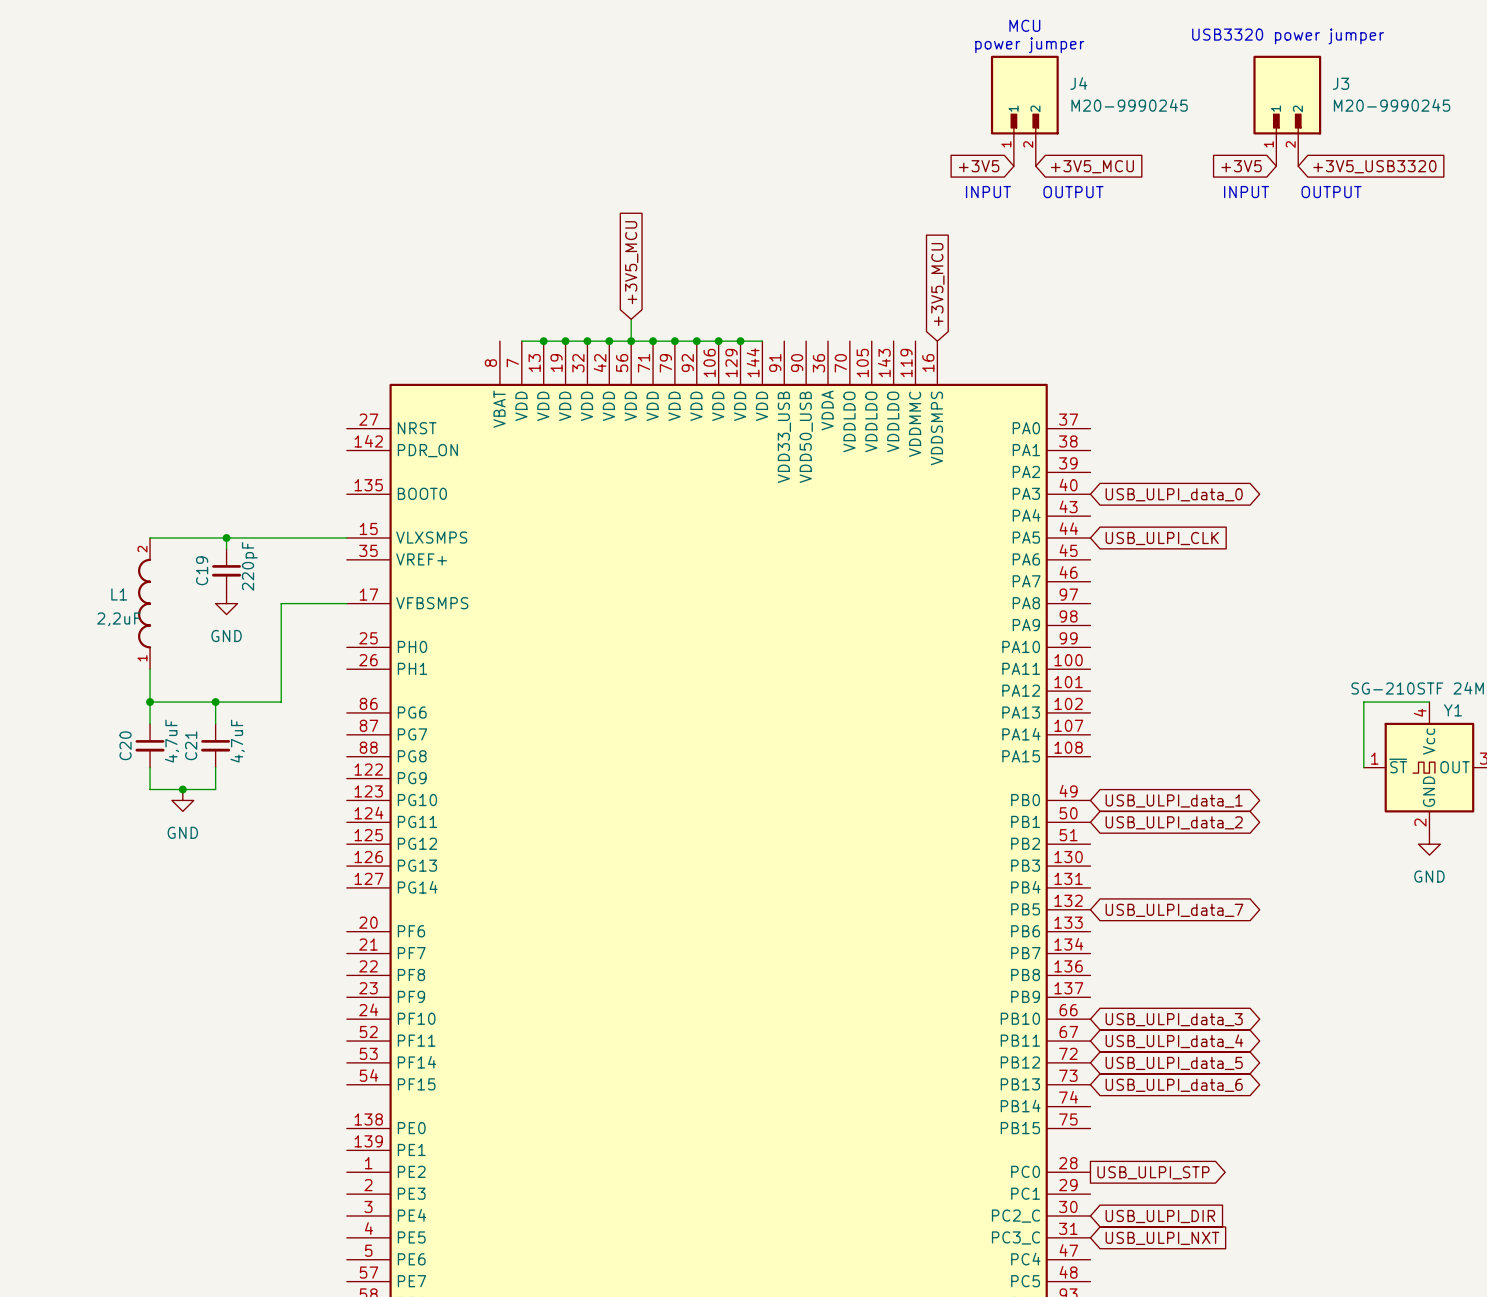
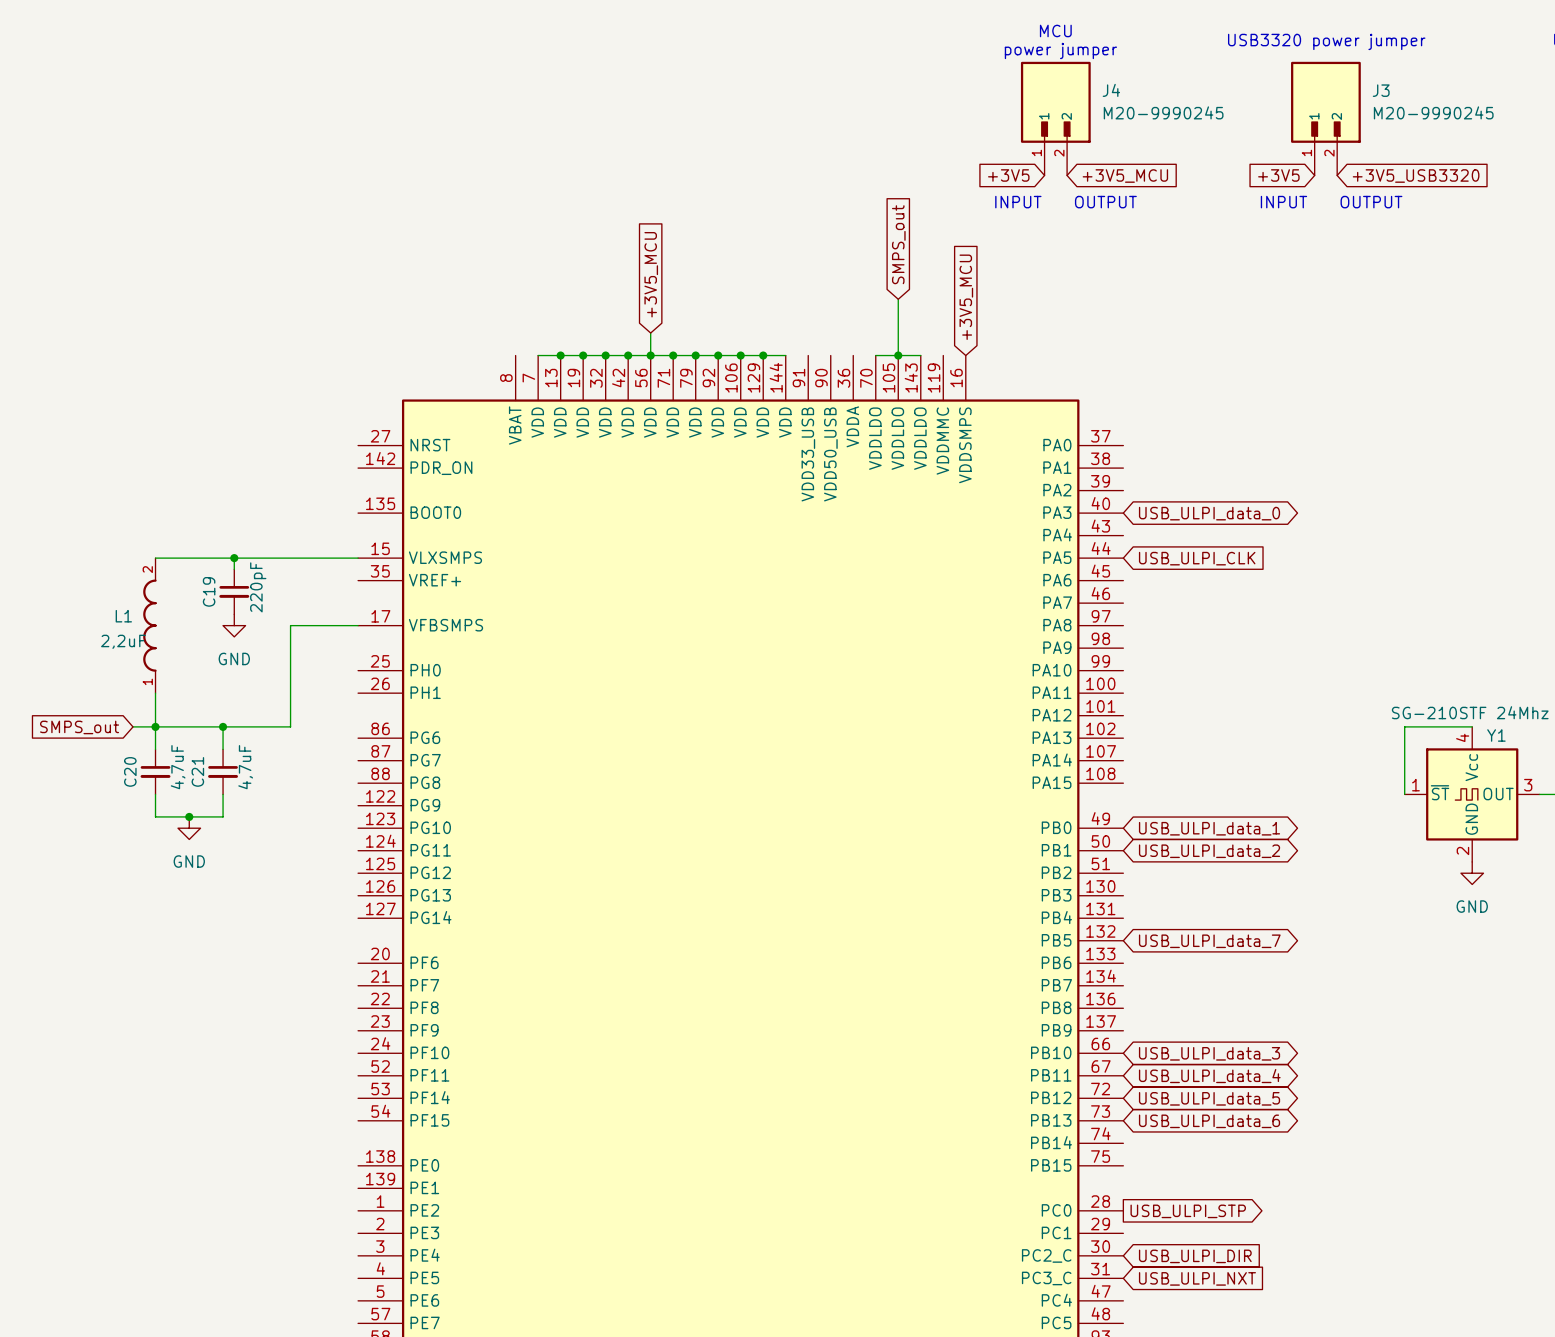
global label: none -> SMPS_out (898, 244)
wire: none -> (898, 299) (898, 355)
wire: none -> (875, 355) (920, 355)
junction: none -> (898, 355)
global label: none -> SMPS_out (79, 727)
wire: none -> (133, 726) (155, 726)

